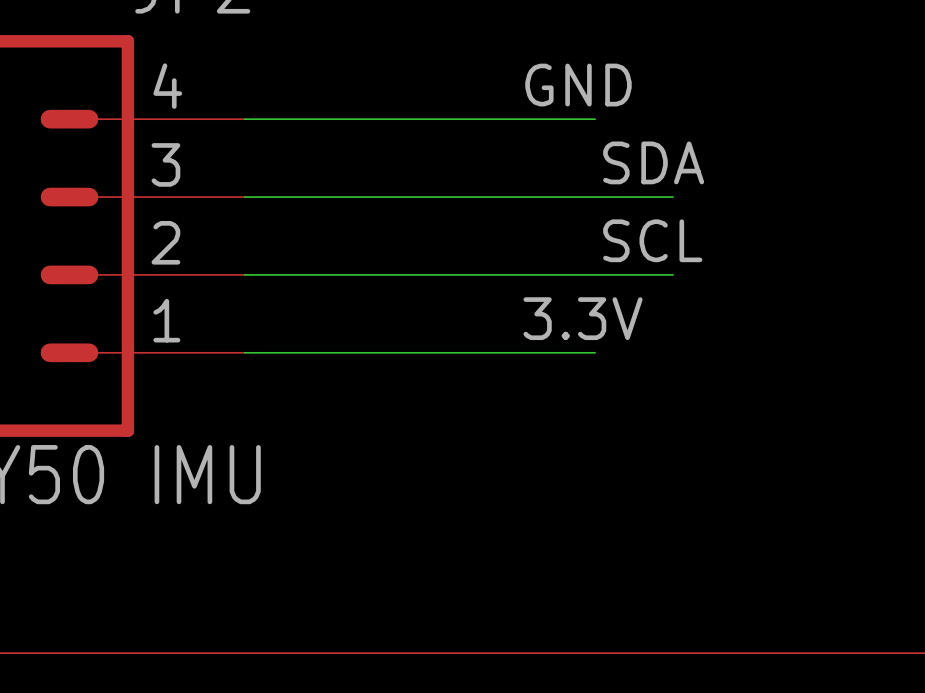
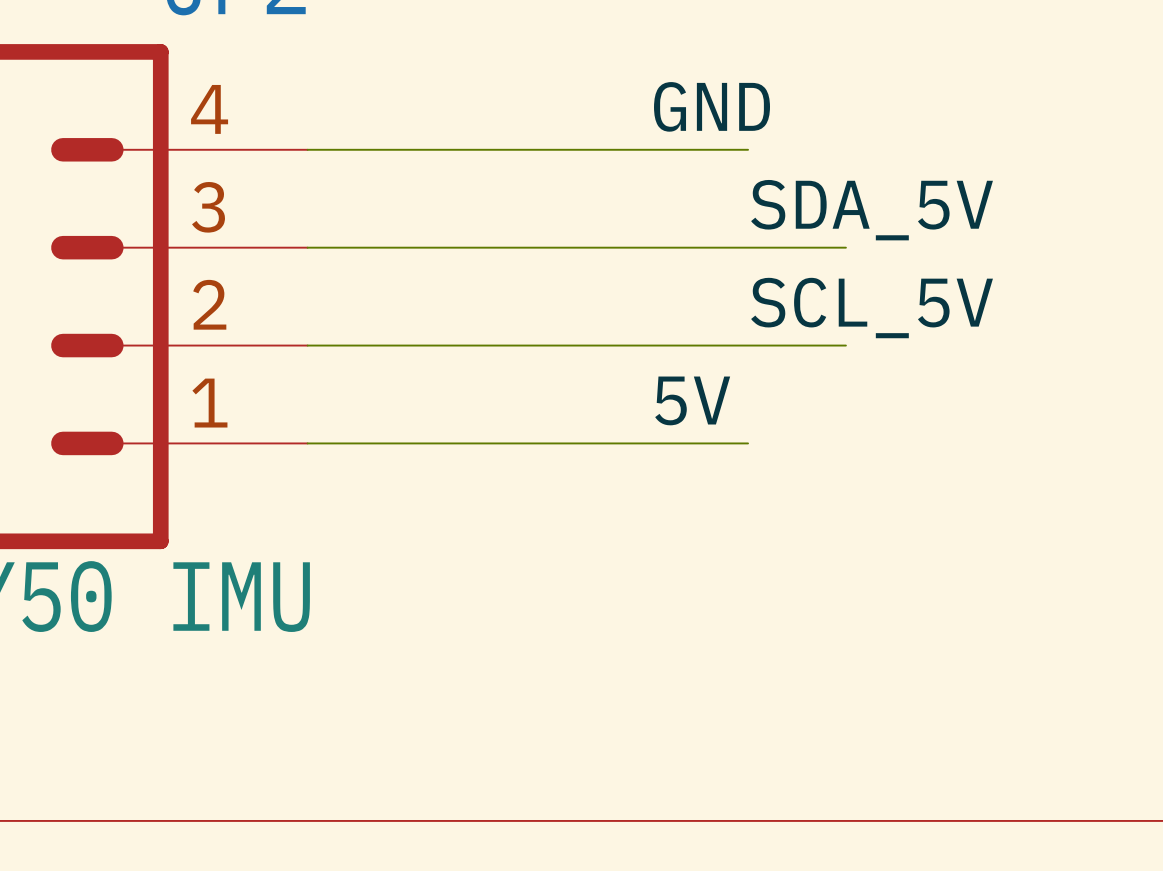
label: SDA (653, 162) -> SDA_5V (872, 210)
label: SCL (652, 240) -> SCL_5V (872, 308)
label: 3.3V (583, 318) -> 5V (692, 400)

